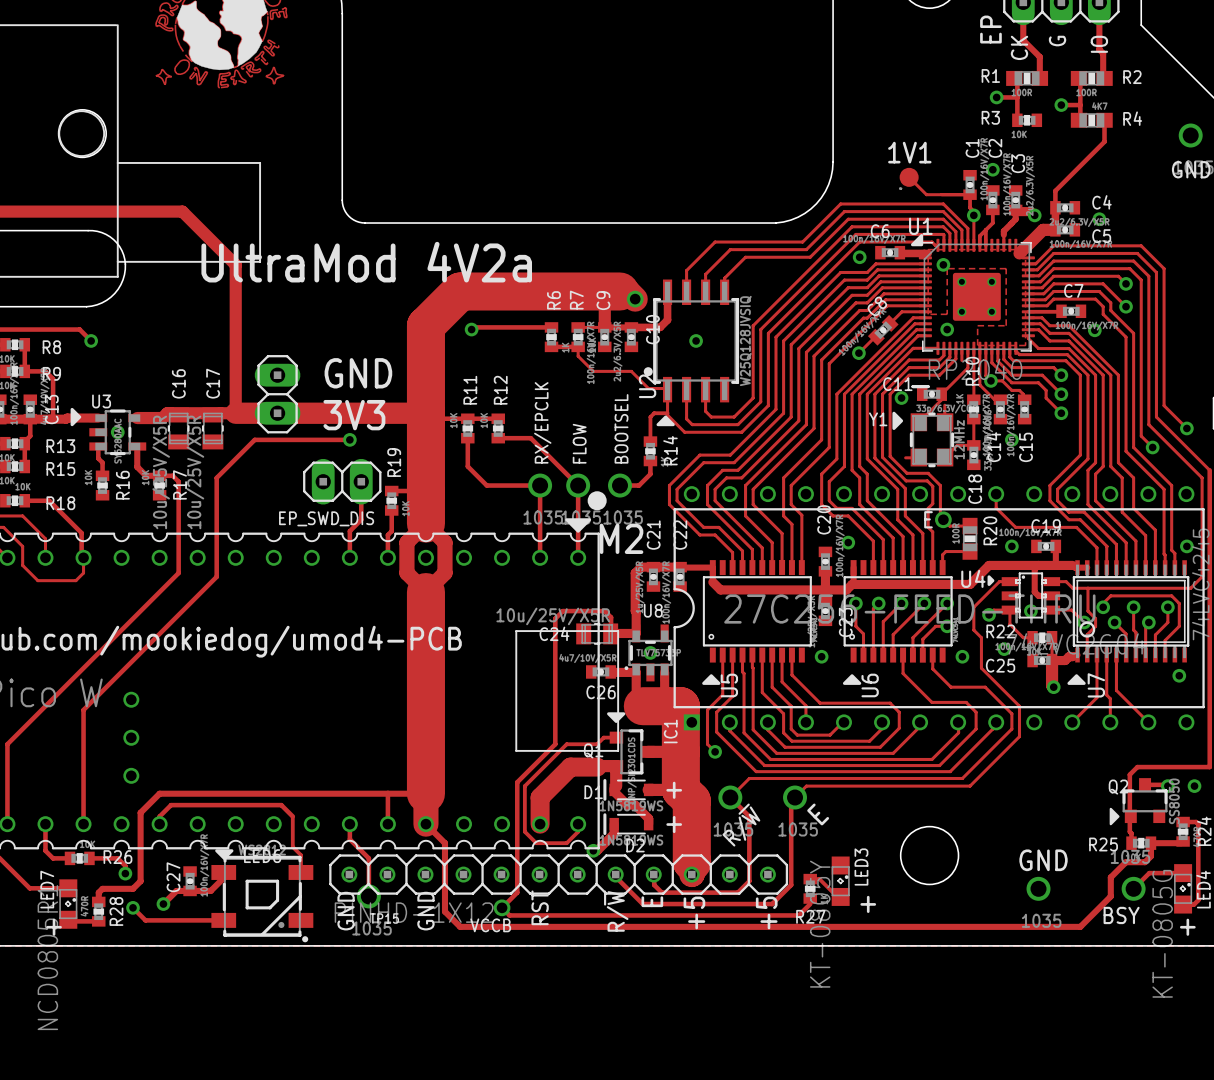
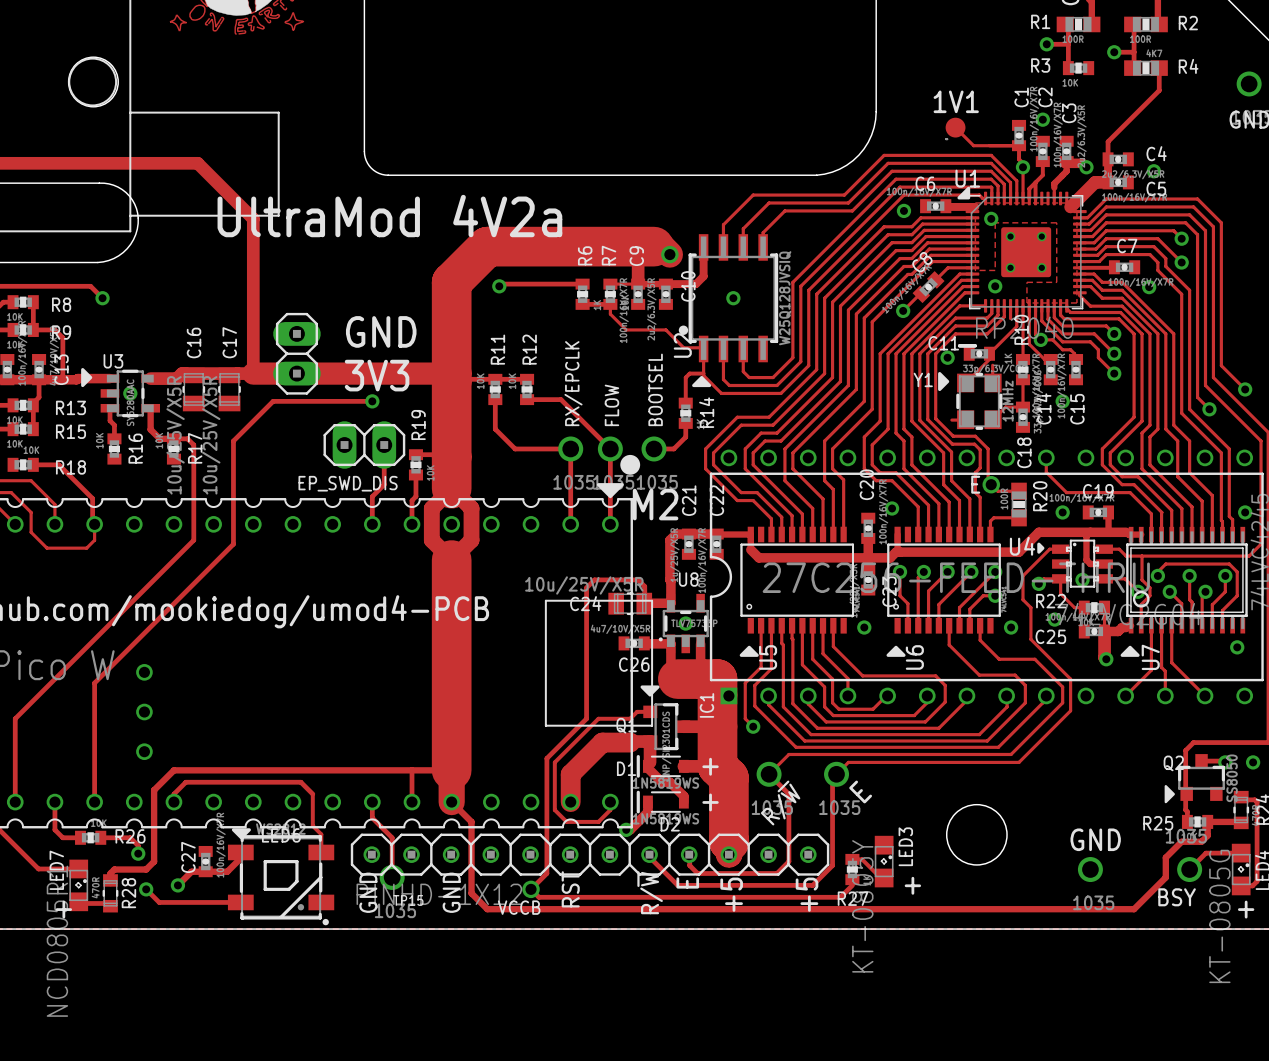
R24 footprint: [1176, 816, 1190, 847] -> [1233, 790, 1250, 830]
R28 footprint: [92, 896, 106, 927] -> [102, 874, 119, 913]

